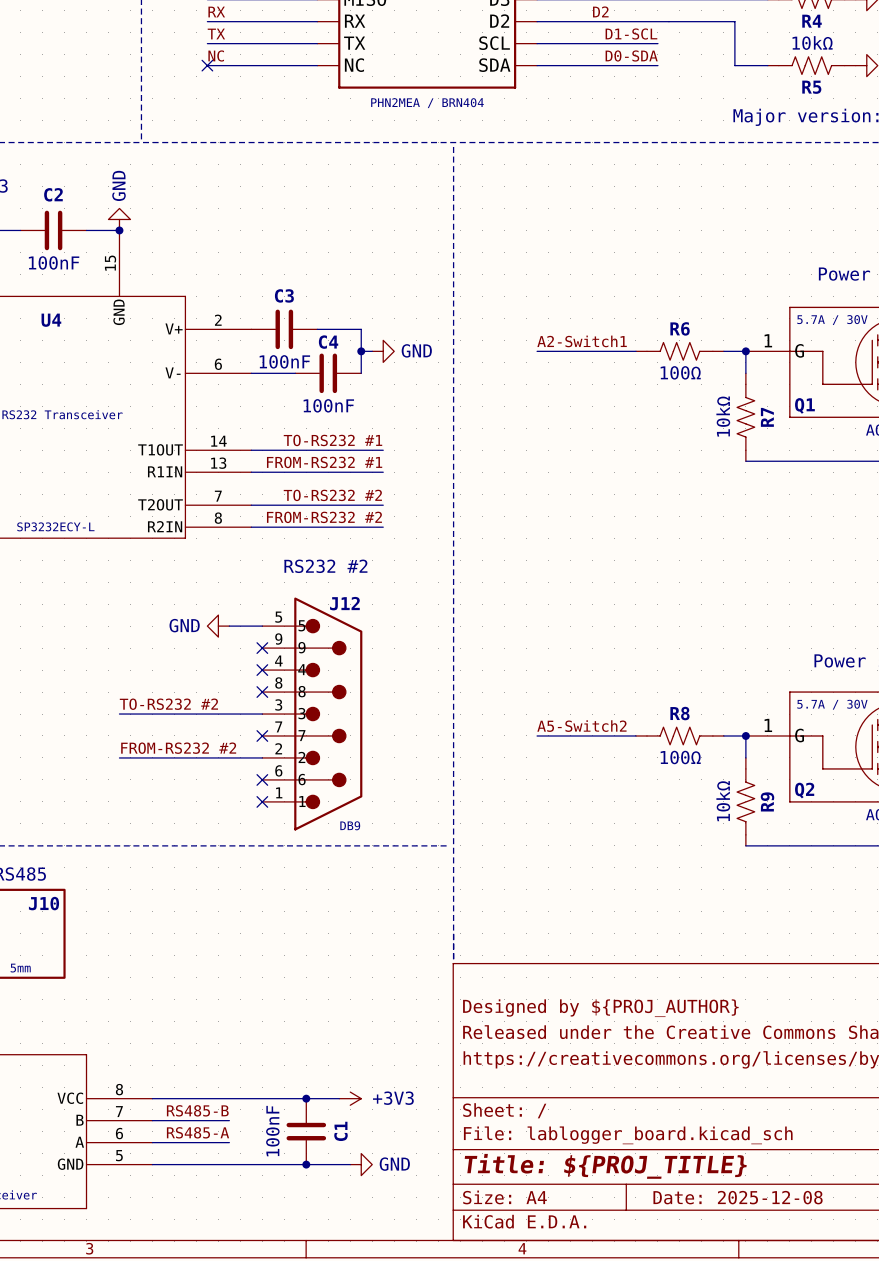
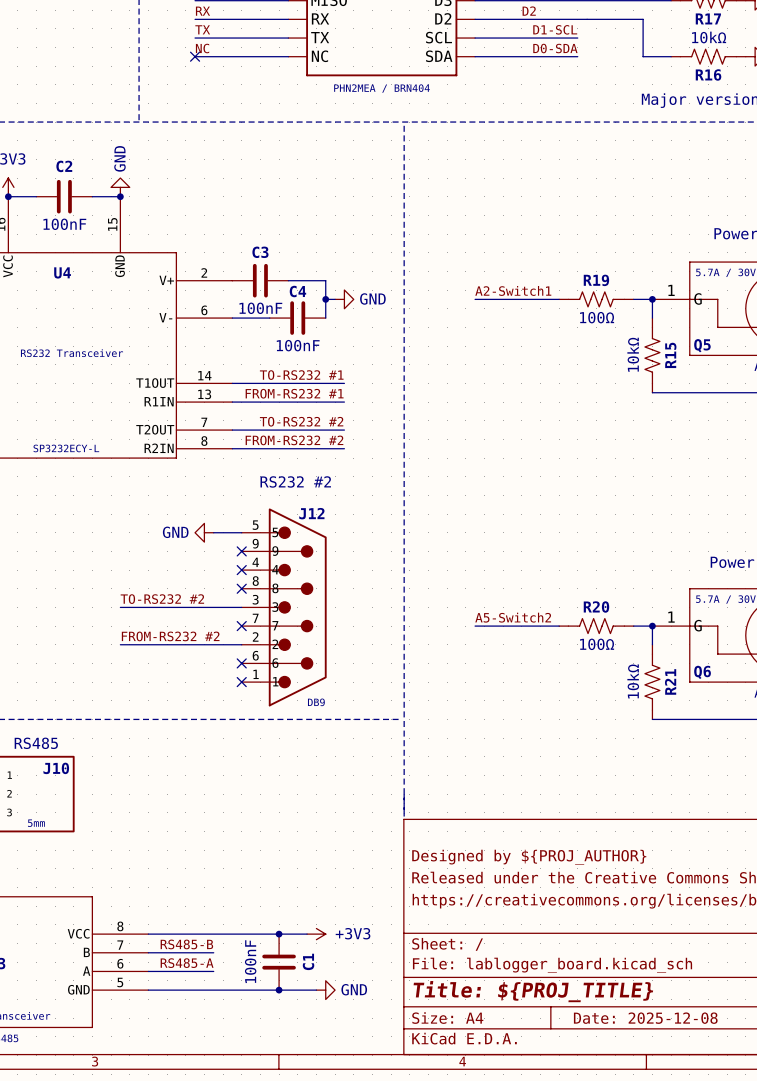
R4 name: R4 (812, 21) -> R17 (708, 18)
R5 name: R5 (811, 87) -> R16 (708, 74)
R6 name: R6 (680, 328) -> R19 (596, 280)
Q1 name: Q1 (804, 405) -> Q5 (702, 345)
R7 name: R7 (767, 417) -> R15 (670, 355)
R8 name: R8 (679, 713) -> R20 (596, 607)
Q2 name: Q2 (804, 790) -> Q6 (702, 672)
R9 name: R9 (767, 801) -> R21 (670, 681)

